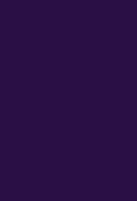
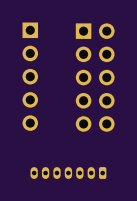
part: none -> (30, 76)
part: none -> (95, 77)
part: none -> (68, 173)

